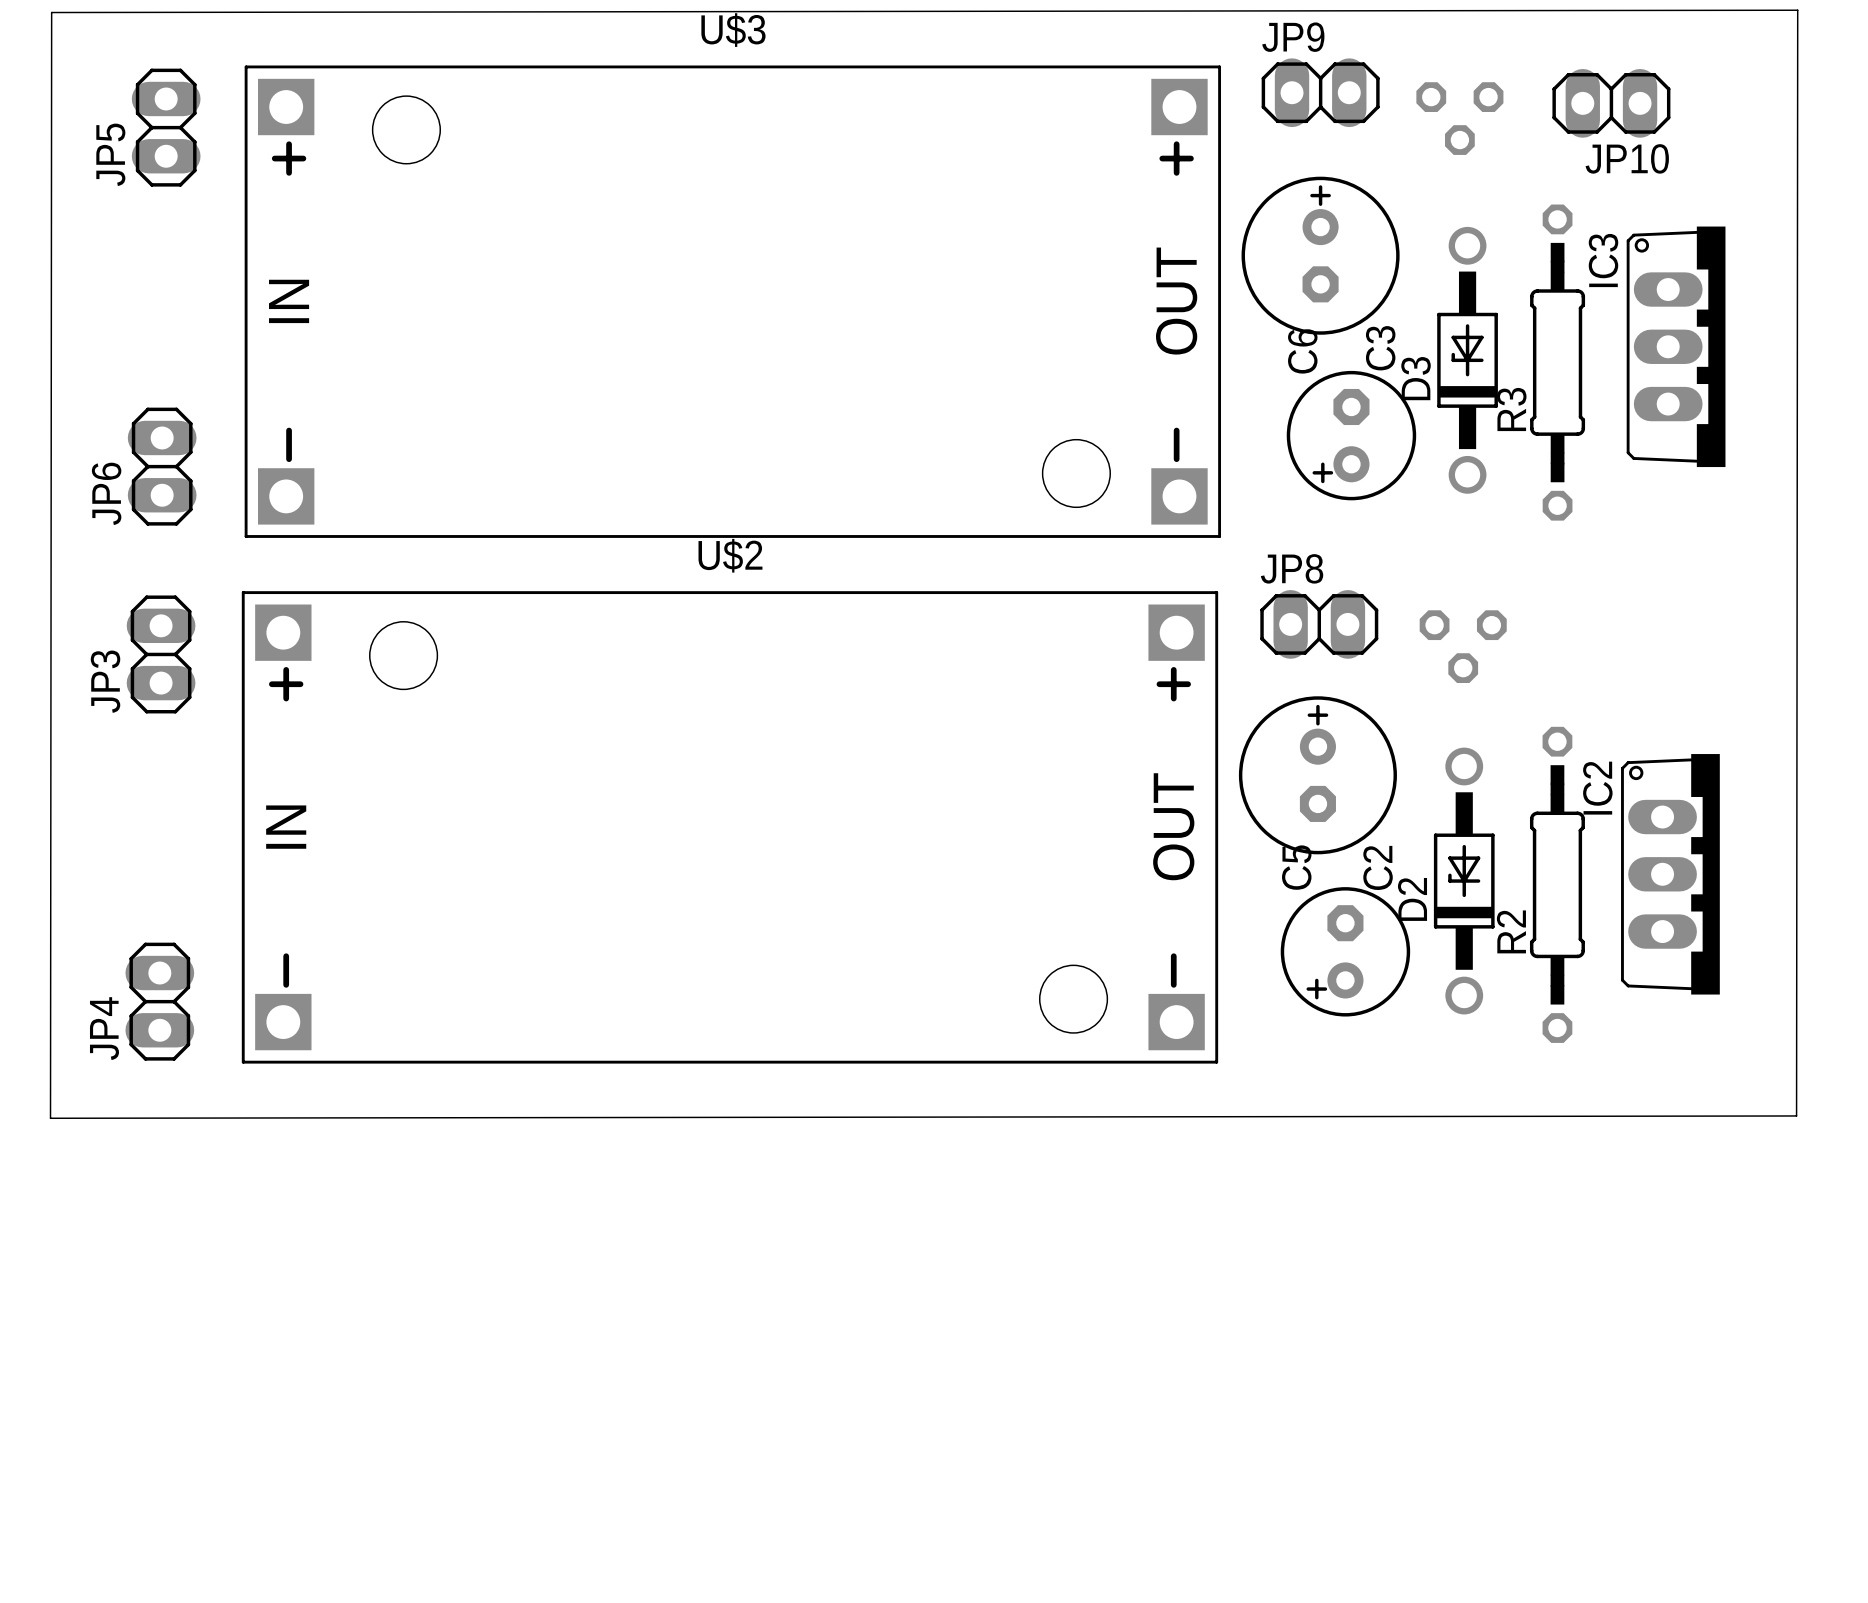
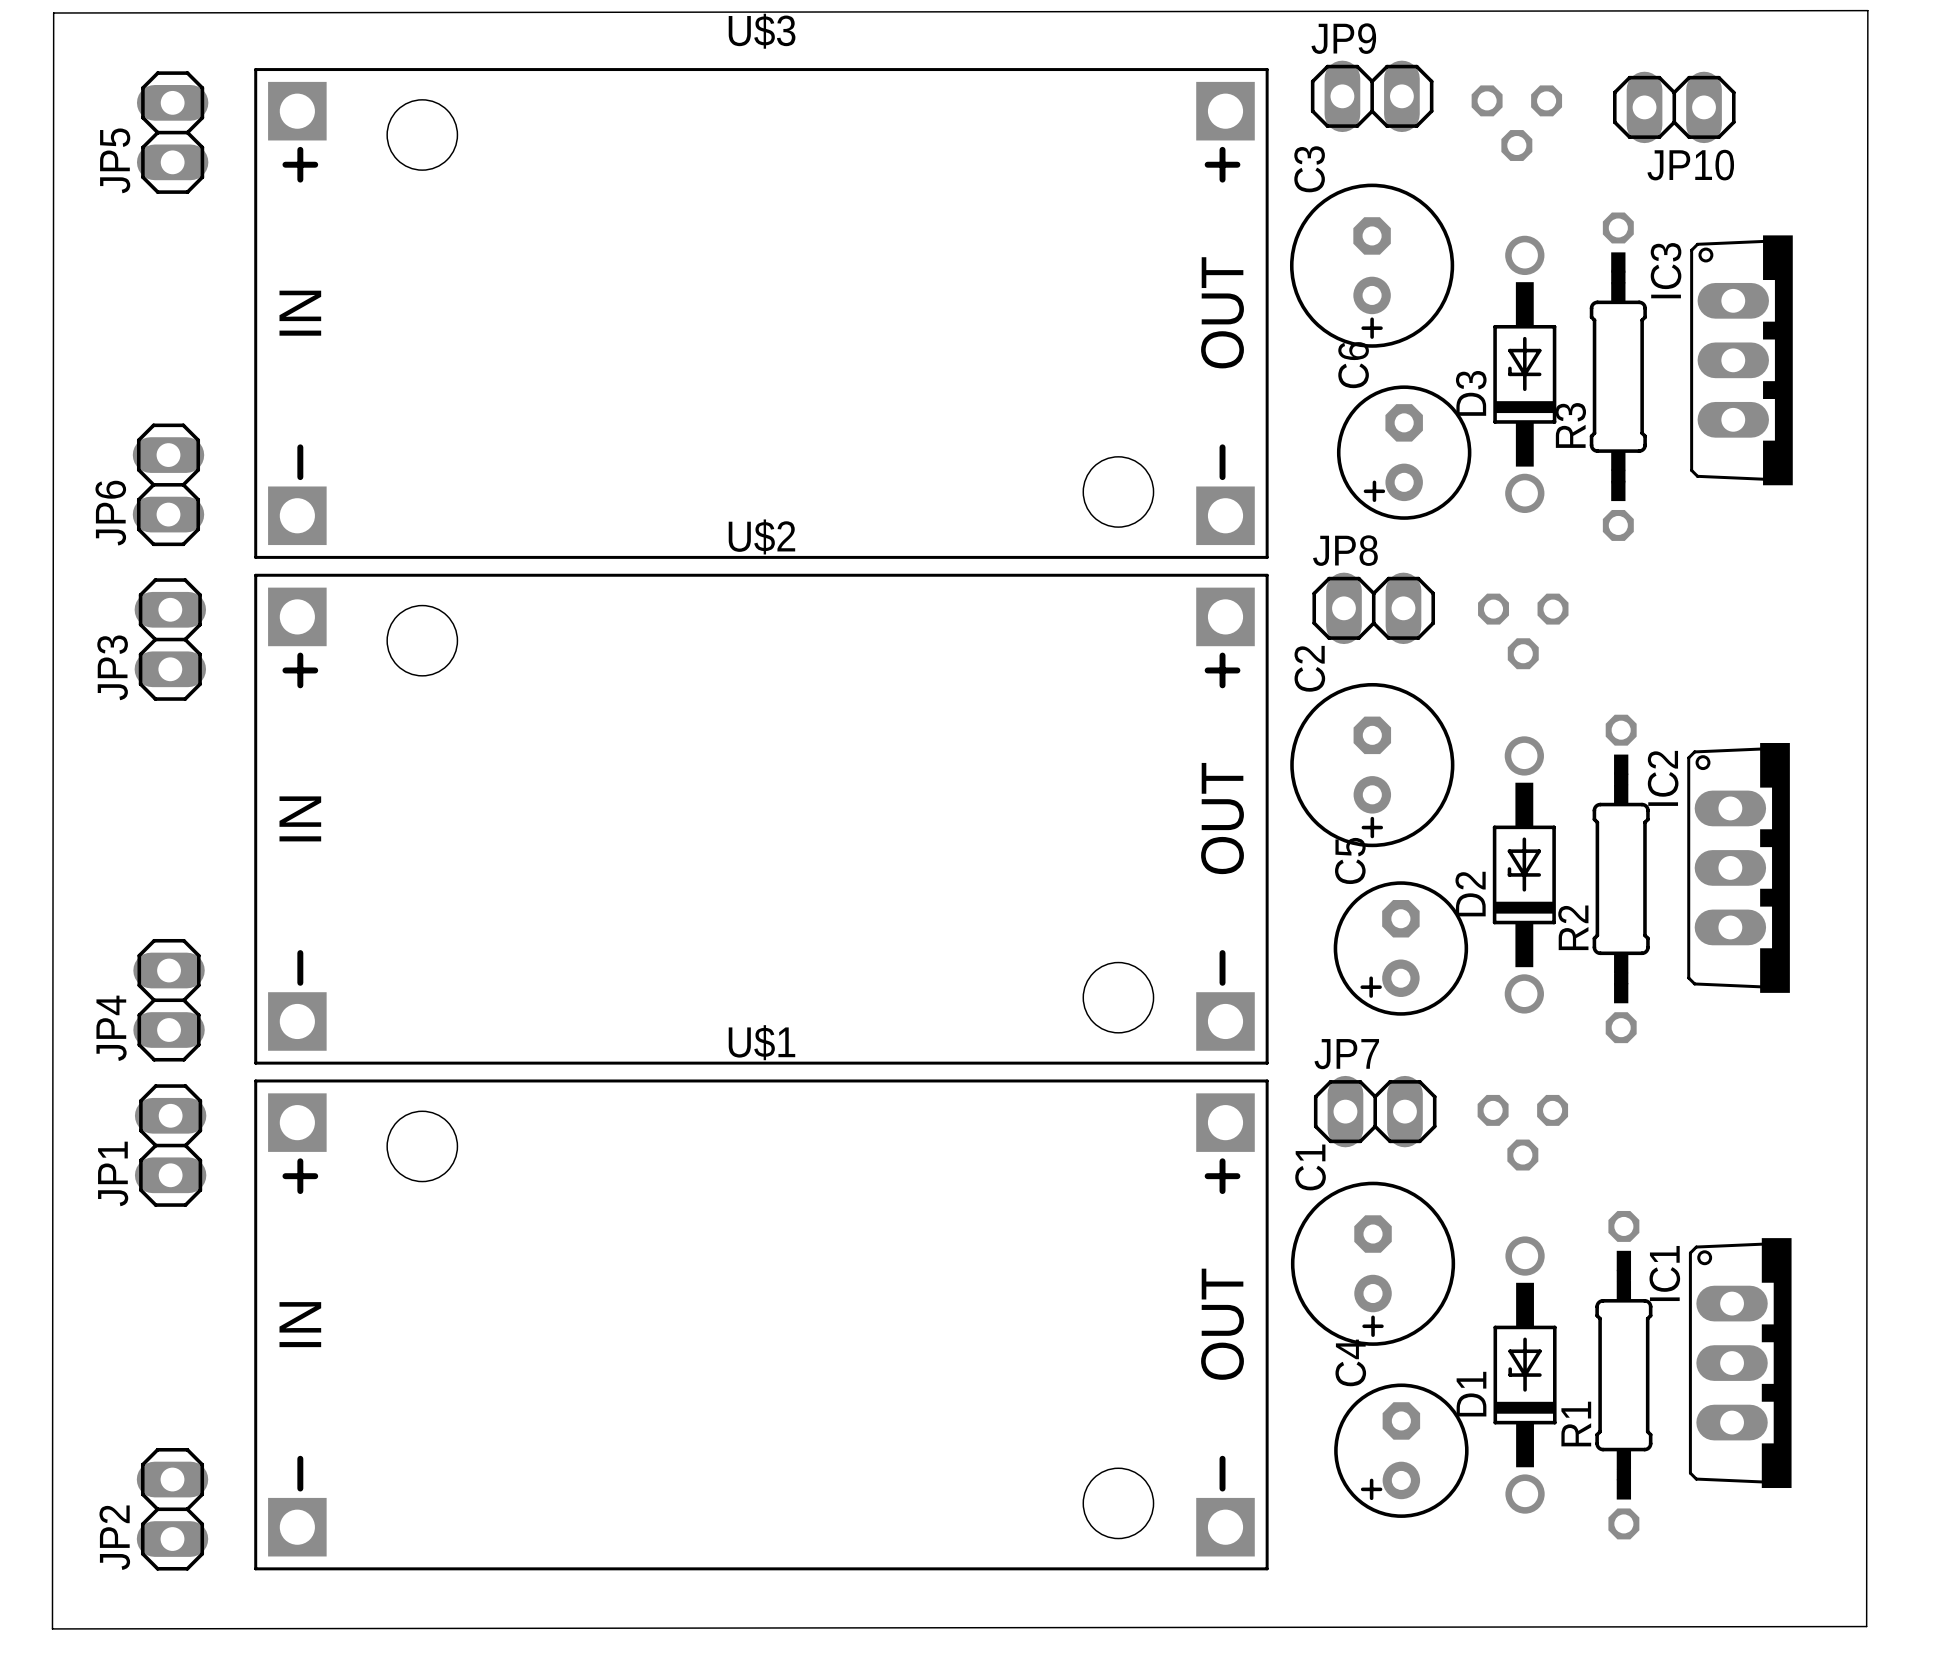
board edge: (1797, 10) (1796, 1115) (50, 1118) (51, 12) -> (1867, 10) (1866, 1626) (52, 1628) (53, 13)
C3 rotation: 0° (1320, 255) -> 180° (1372, 265)
JP8 position: (1319, 624) -> (1373, 608)
part position: (1463, 646) -> (1523, 631)
JP3 position: (161, 654) -> (170, 639)
C2 rotation: 0° (1317, 775) -> 180° (1372, 765)
U$2 position: (729, 827) -> (761, 819)
IC2 position: (1670, 874) -> (1738, 867)
D2 position: (1464, 881) -> (1524, 874)
R2 position: (1557, 884) -> (1621, 878)
C5 position: (1345, 951) -> (1400, 948)
JP4 position: (159, 1001) -> (169, 1000)
JP7: none -> (1375, 1111)
part: none -> (1522, 1132)
JP1: none -> (170, 1145)
C1: none -> (1373, 1263)
U$1: none -> (761, 1324)
IC1: none -> (1740, 1363)
D1: none -> (1525, 1375)
R1: none -> (1623, 1375)
C4: none -> (1401, 1450)
JP2: none -> (172, 1509)

